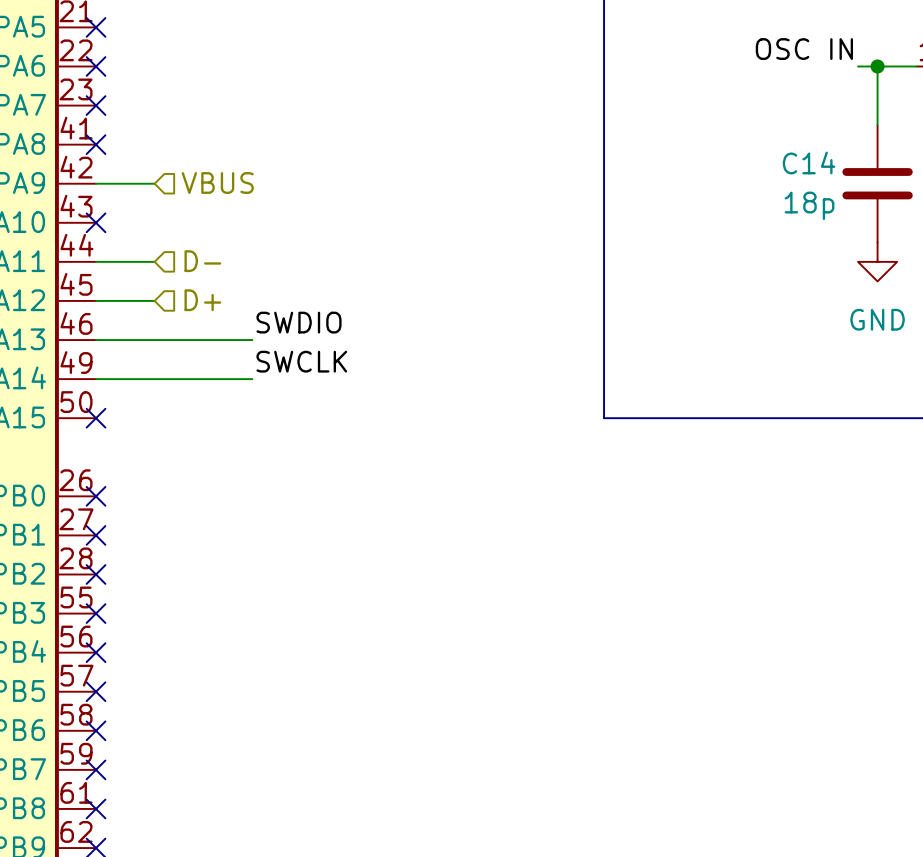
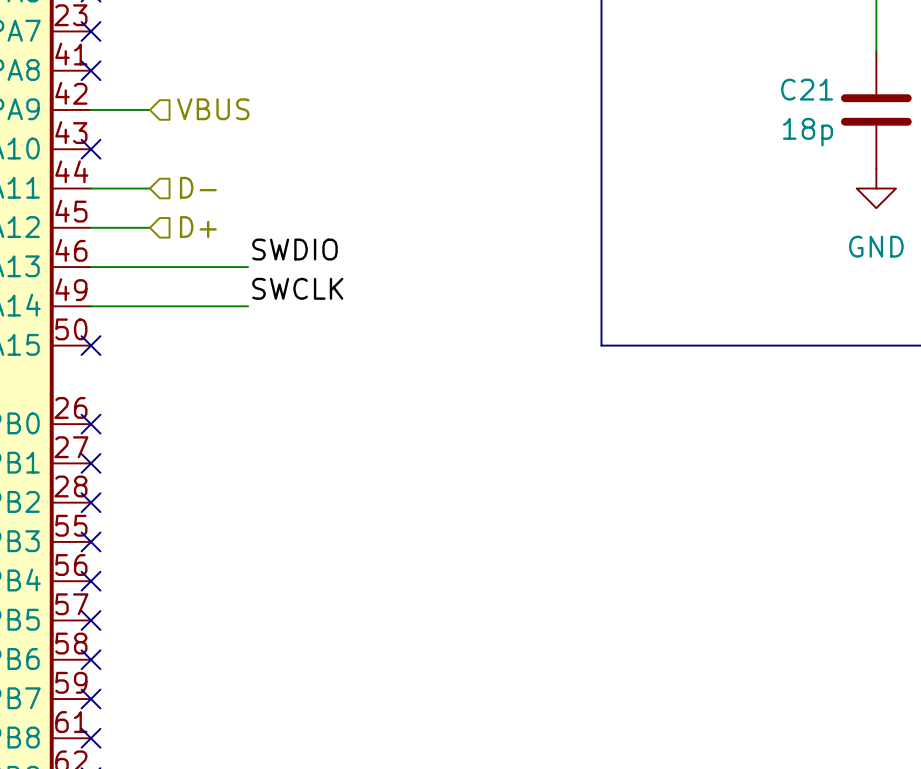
C14 name: C14 (809, 162) -> C21 (807, 89)

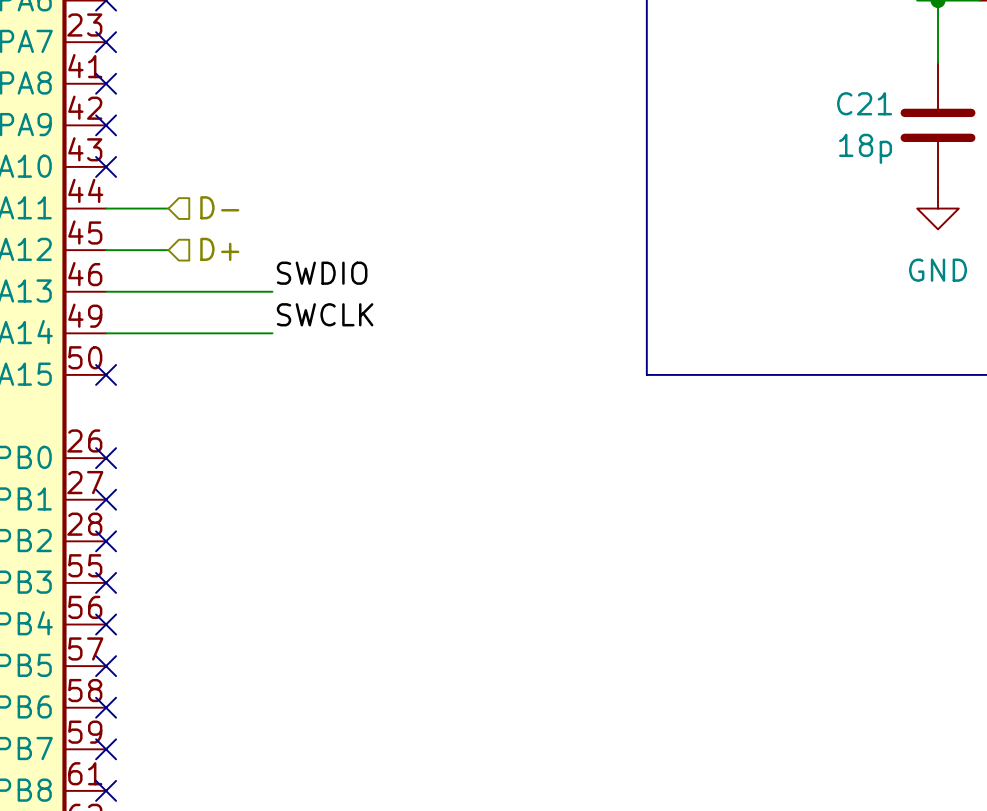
wire: (91, 109) (149, 109) -> none
no-connect mark: none -> (106, 125)
hierarchical label: VBUS (213, 109) -> none

